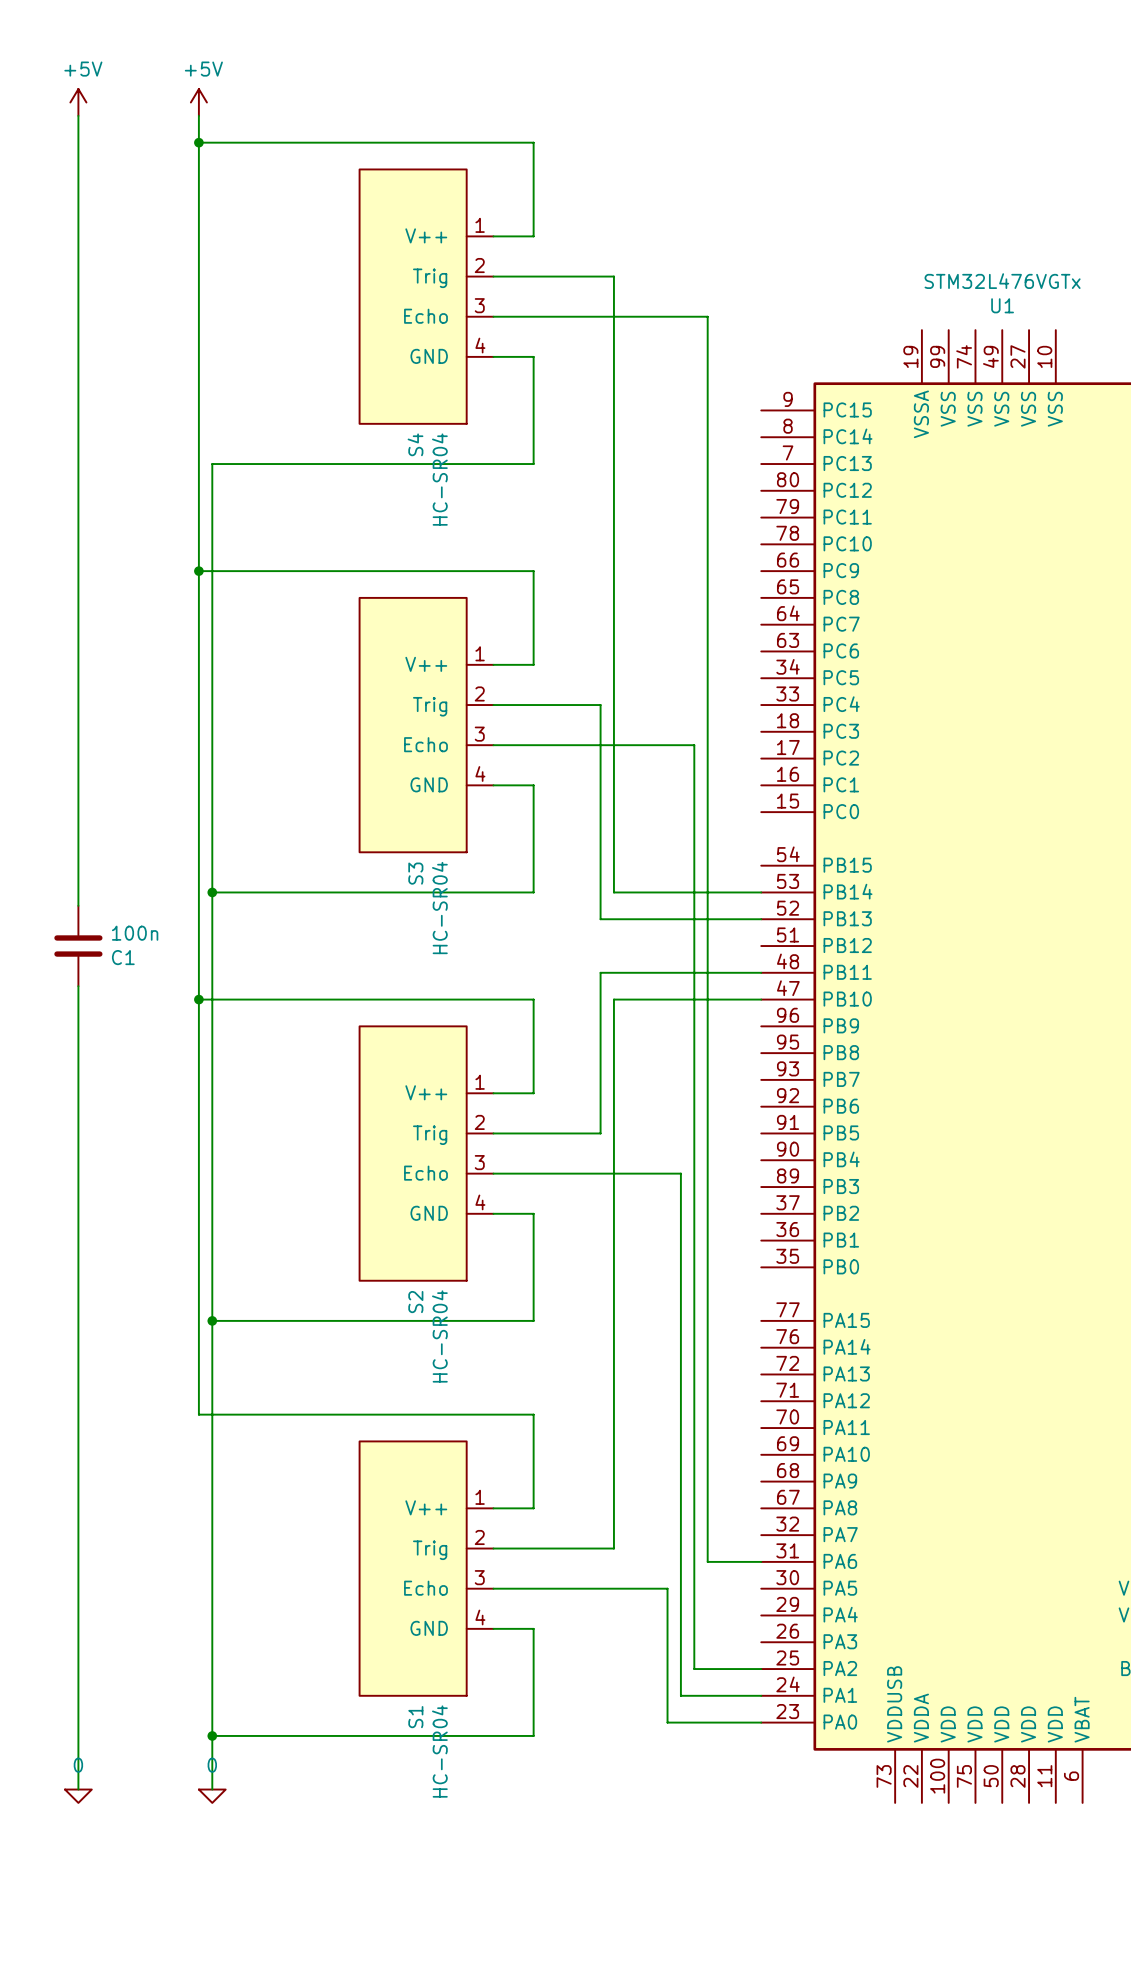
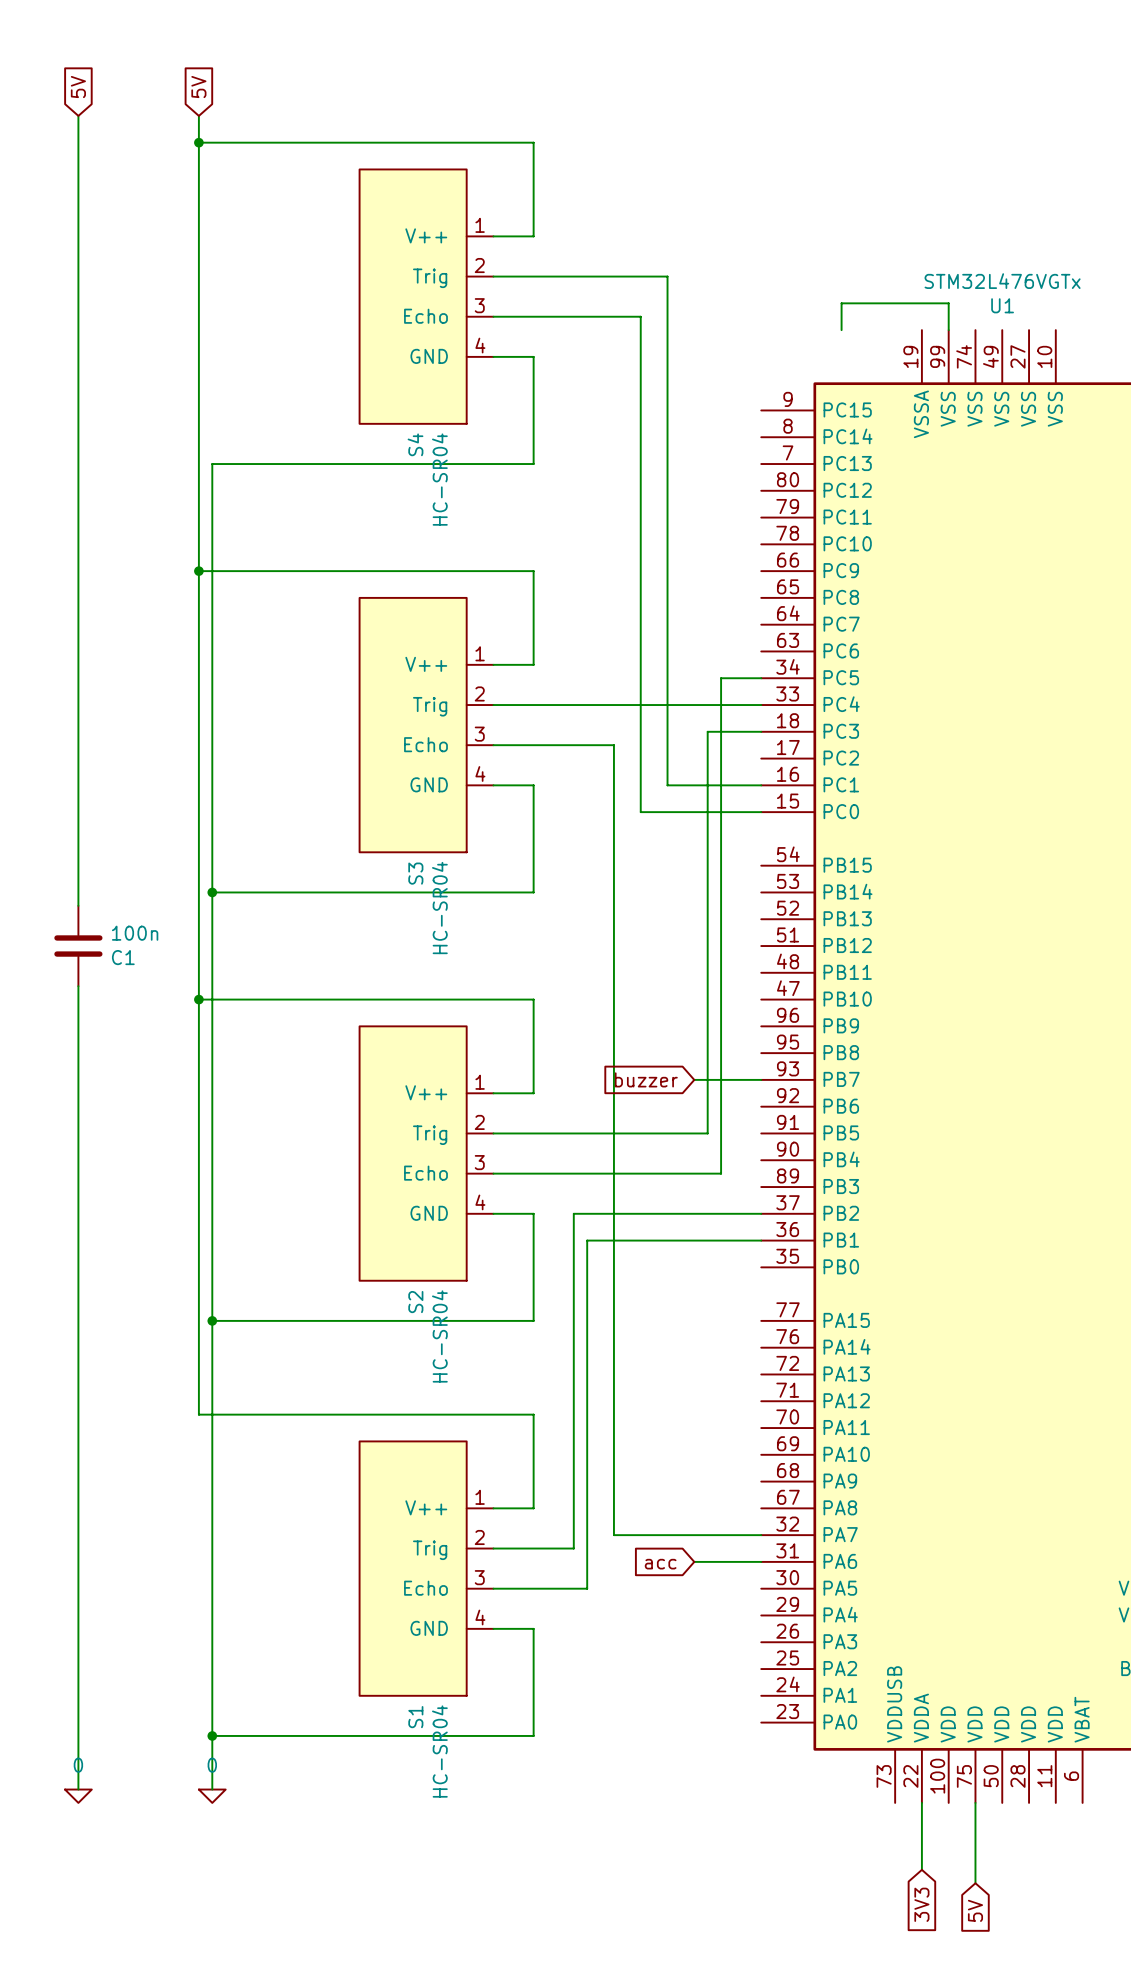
global label: none -> 5V (78, 87)
global label: none -> 5V (198, 87)
power symbol: +5V (78, 102) -> none
power symbol: +5V (198, 102) -> none
wire: (613, 276) (613, 745) (694, 745) (694, 1669) (761, 1669) -> (613, 276) (667, 276) (667, 785) (761, 785)
wire: (640, 316) (707, 316) (707, 731) -> (640, 316) (640, 812) (761, 812)
wire: none -> (841, 330) (841, 303) (948, 303) (948, 330)
wire: (600, 705) (600, 919) (761, 919) -> (600, 705) (761, 705)
wire: none -> (707, 731) (761, 731)
wire: (613, 892) (761, 892) -> (613, 892) (613, 999)
wire: (761, 972) (600, 972) (600, 1133) -> (707, 1133) (600, 1133)
wire: (613, 999) (761, 999) -> none
global label: none -> buzzer (646, 1079)
wire: none -> (694, 1079) (761, 1079)
wire: (707, 1133) (707, 1561) -> (694, 1561) (707, 1561)
wire: (680, 1173) (680, 1695) (761, 1695) -> (680, 1173) (721, 1173) (721, 678) (761, 678)
wire: none -> (761, 1213) (573, 1213) (573, 1548)
wire: (613, 1535) (613, 1548) (573, 1548) -> (613, 1535) (761, 1535)
global label: none -> acc (660, 1564)
wire: (587, 1588) (667, 1588) (667, 1722) (761, 1722) -> (587, 1588) (587, 1240) (761, 1240)
wire: none -> (921, 1802) (921, 1869)
wire: none -> (975, 1802) (975, 1883)
global label: none -> 3V3 (921, 1904)
global label: none -> 5V (975, 1910)

